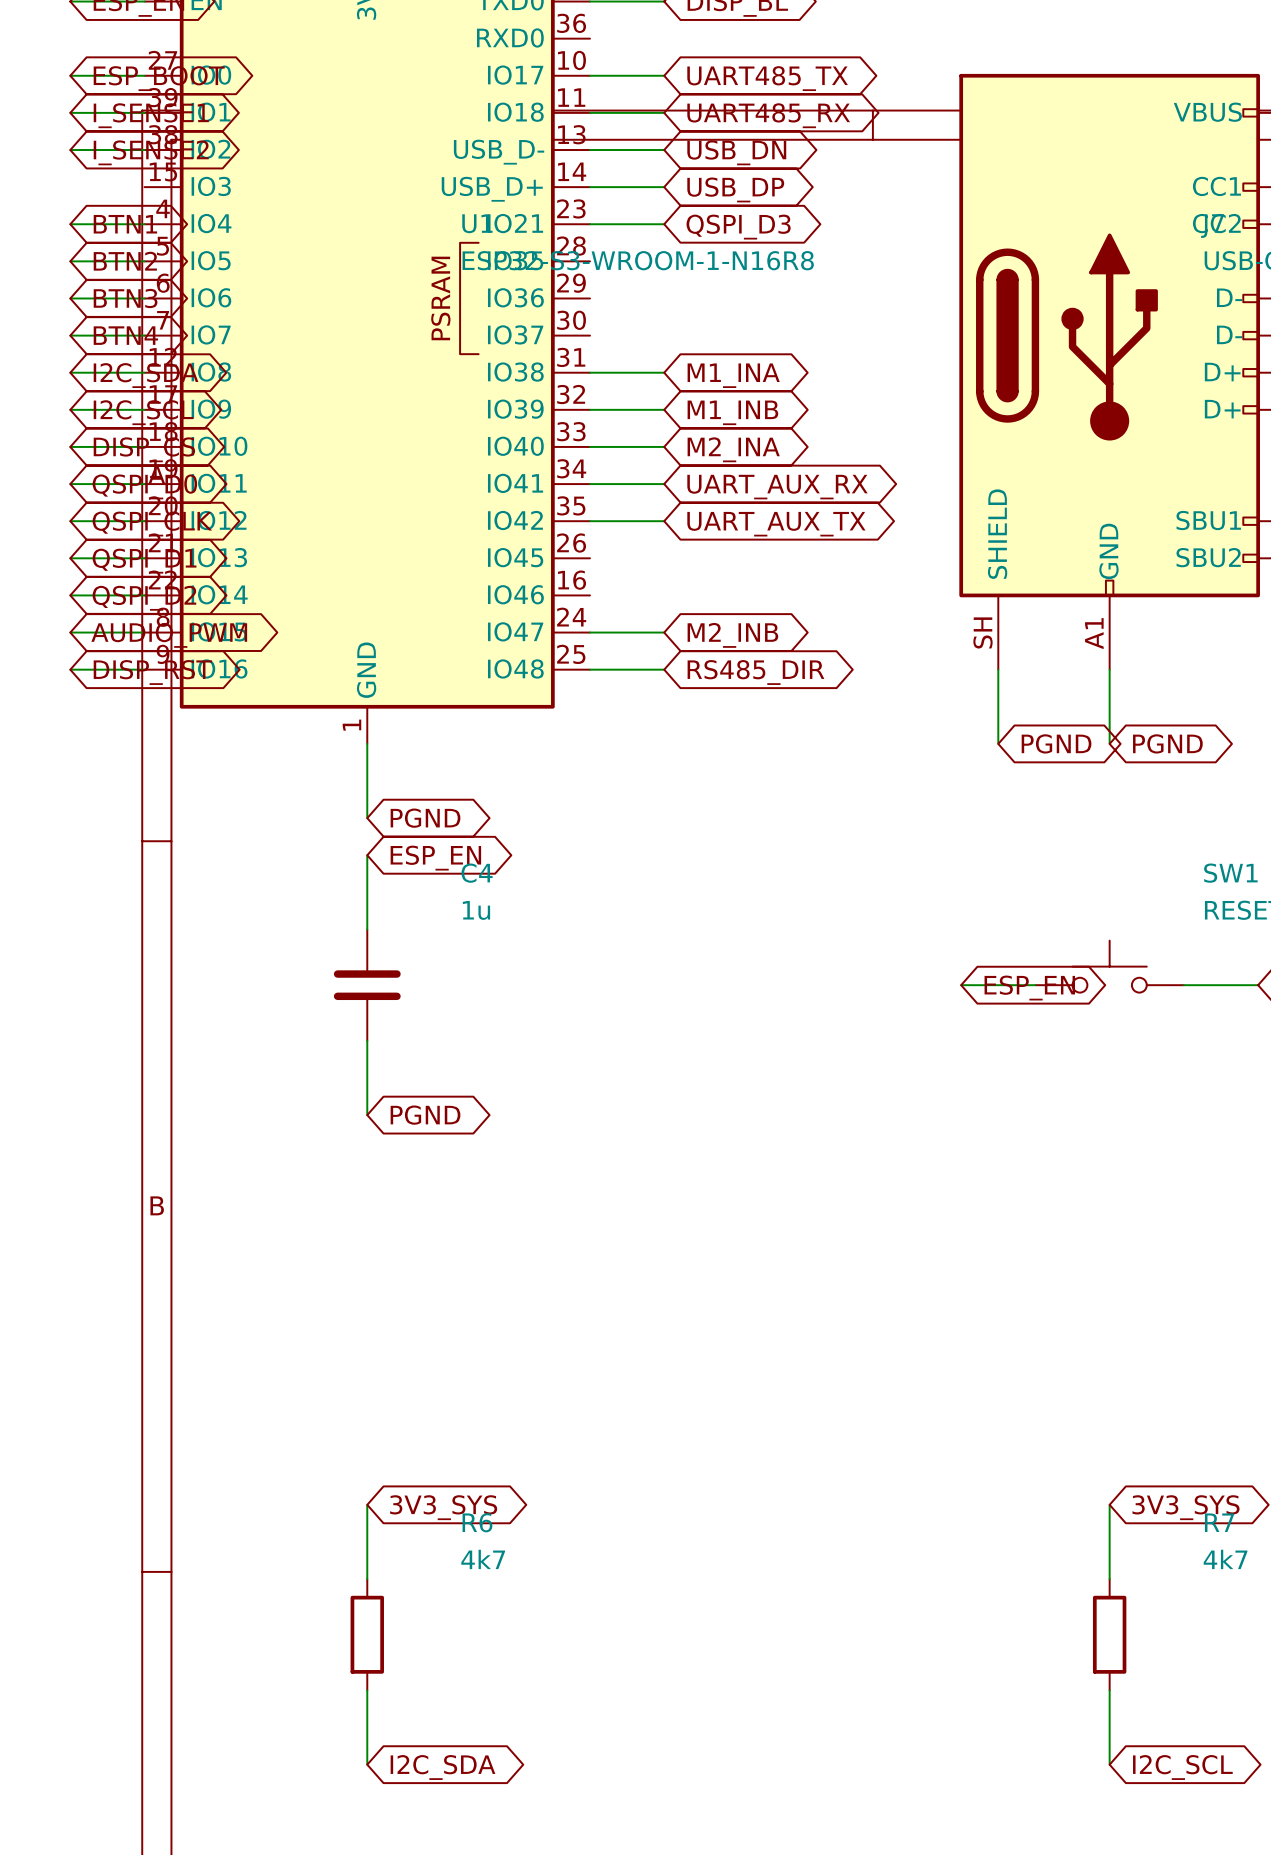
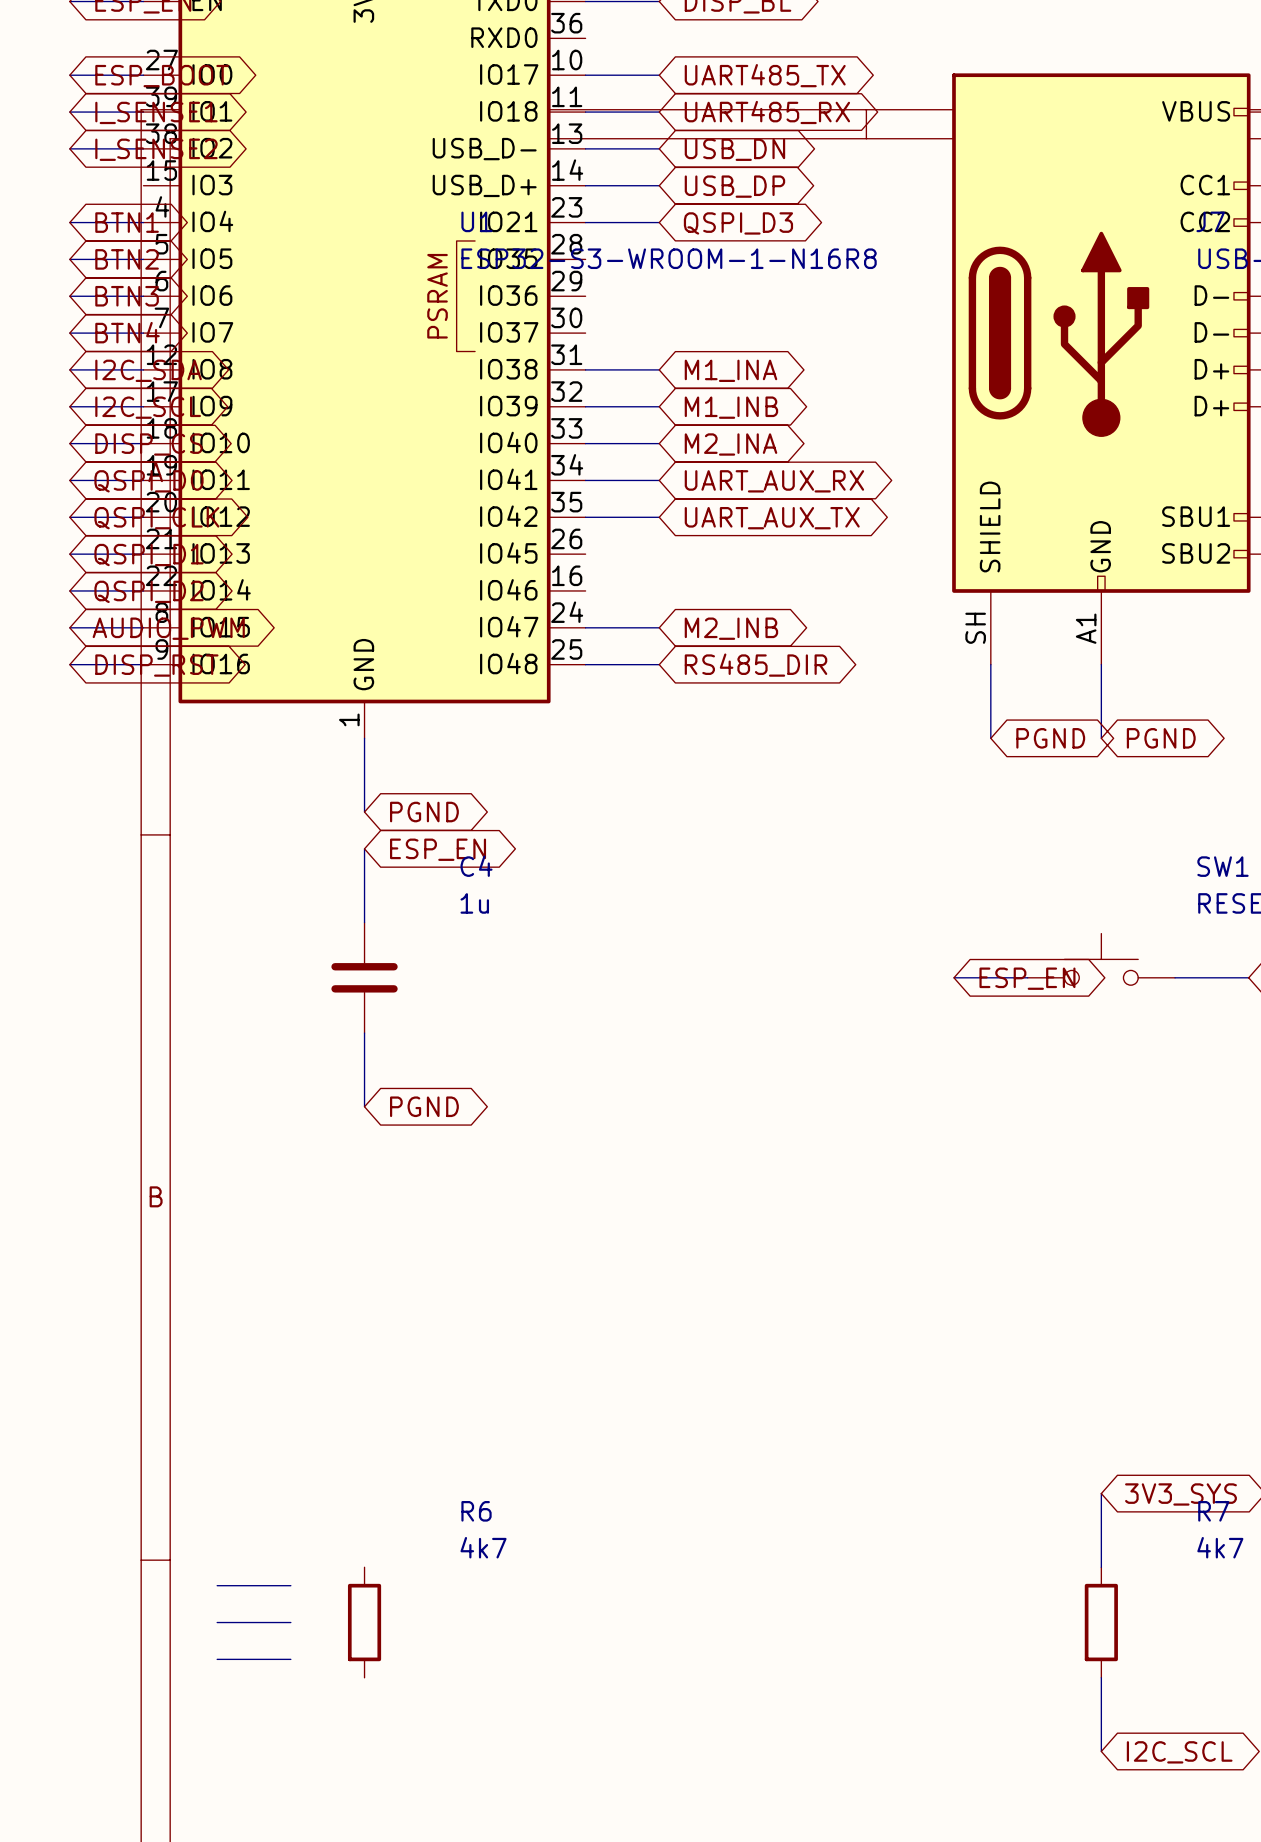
wire: (367, 1504) (367, 1579) -> none
global label: 3V3_SYS (443, 1507) -> none
wire: none -> (217, 1585) (290, 1585)
wire: none -> (217, 1622) (290, 1622)
wire: none -> (217, 1659) (290, 1659)
wire: (367, 1690) (367, 1764) -> none
global label: I2C_SDA (442, 1767) -> none

